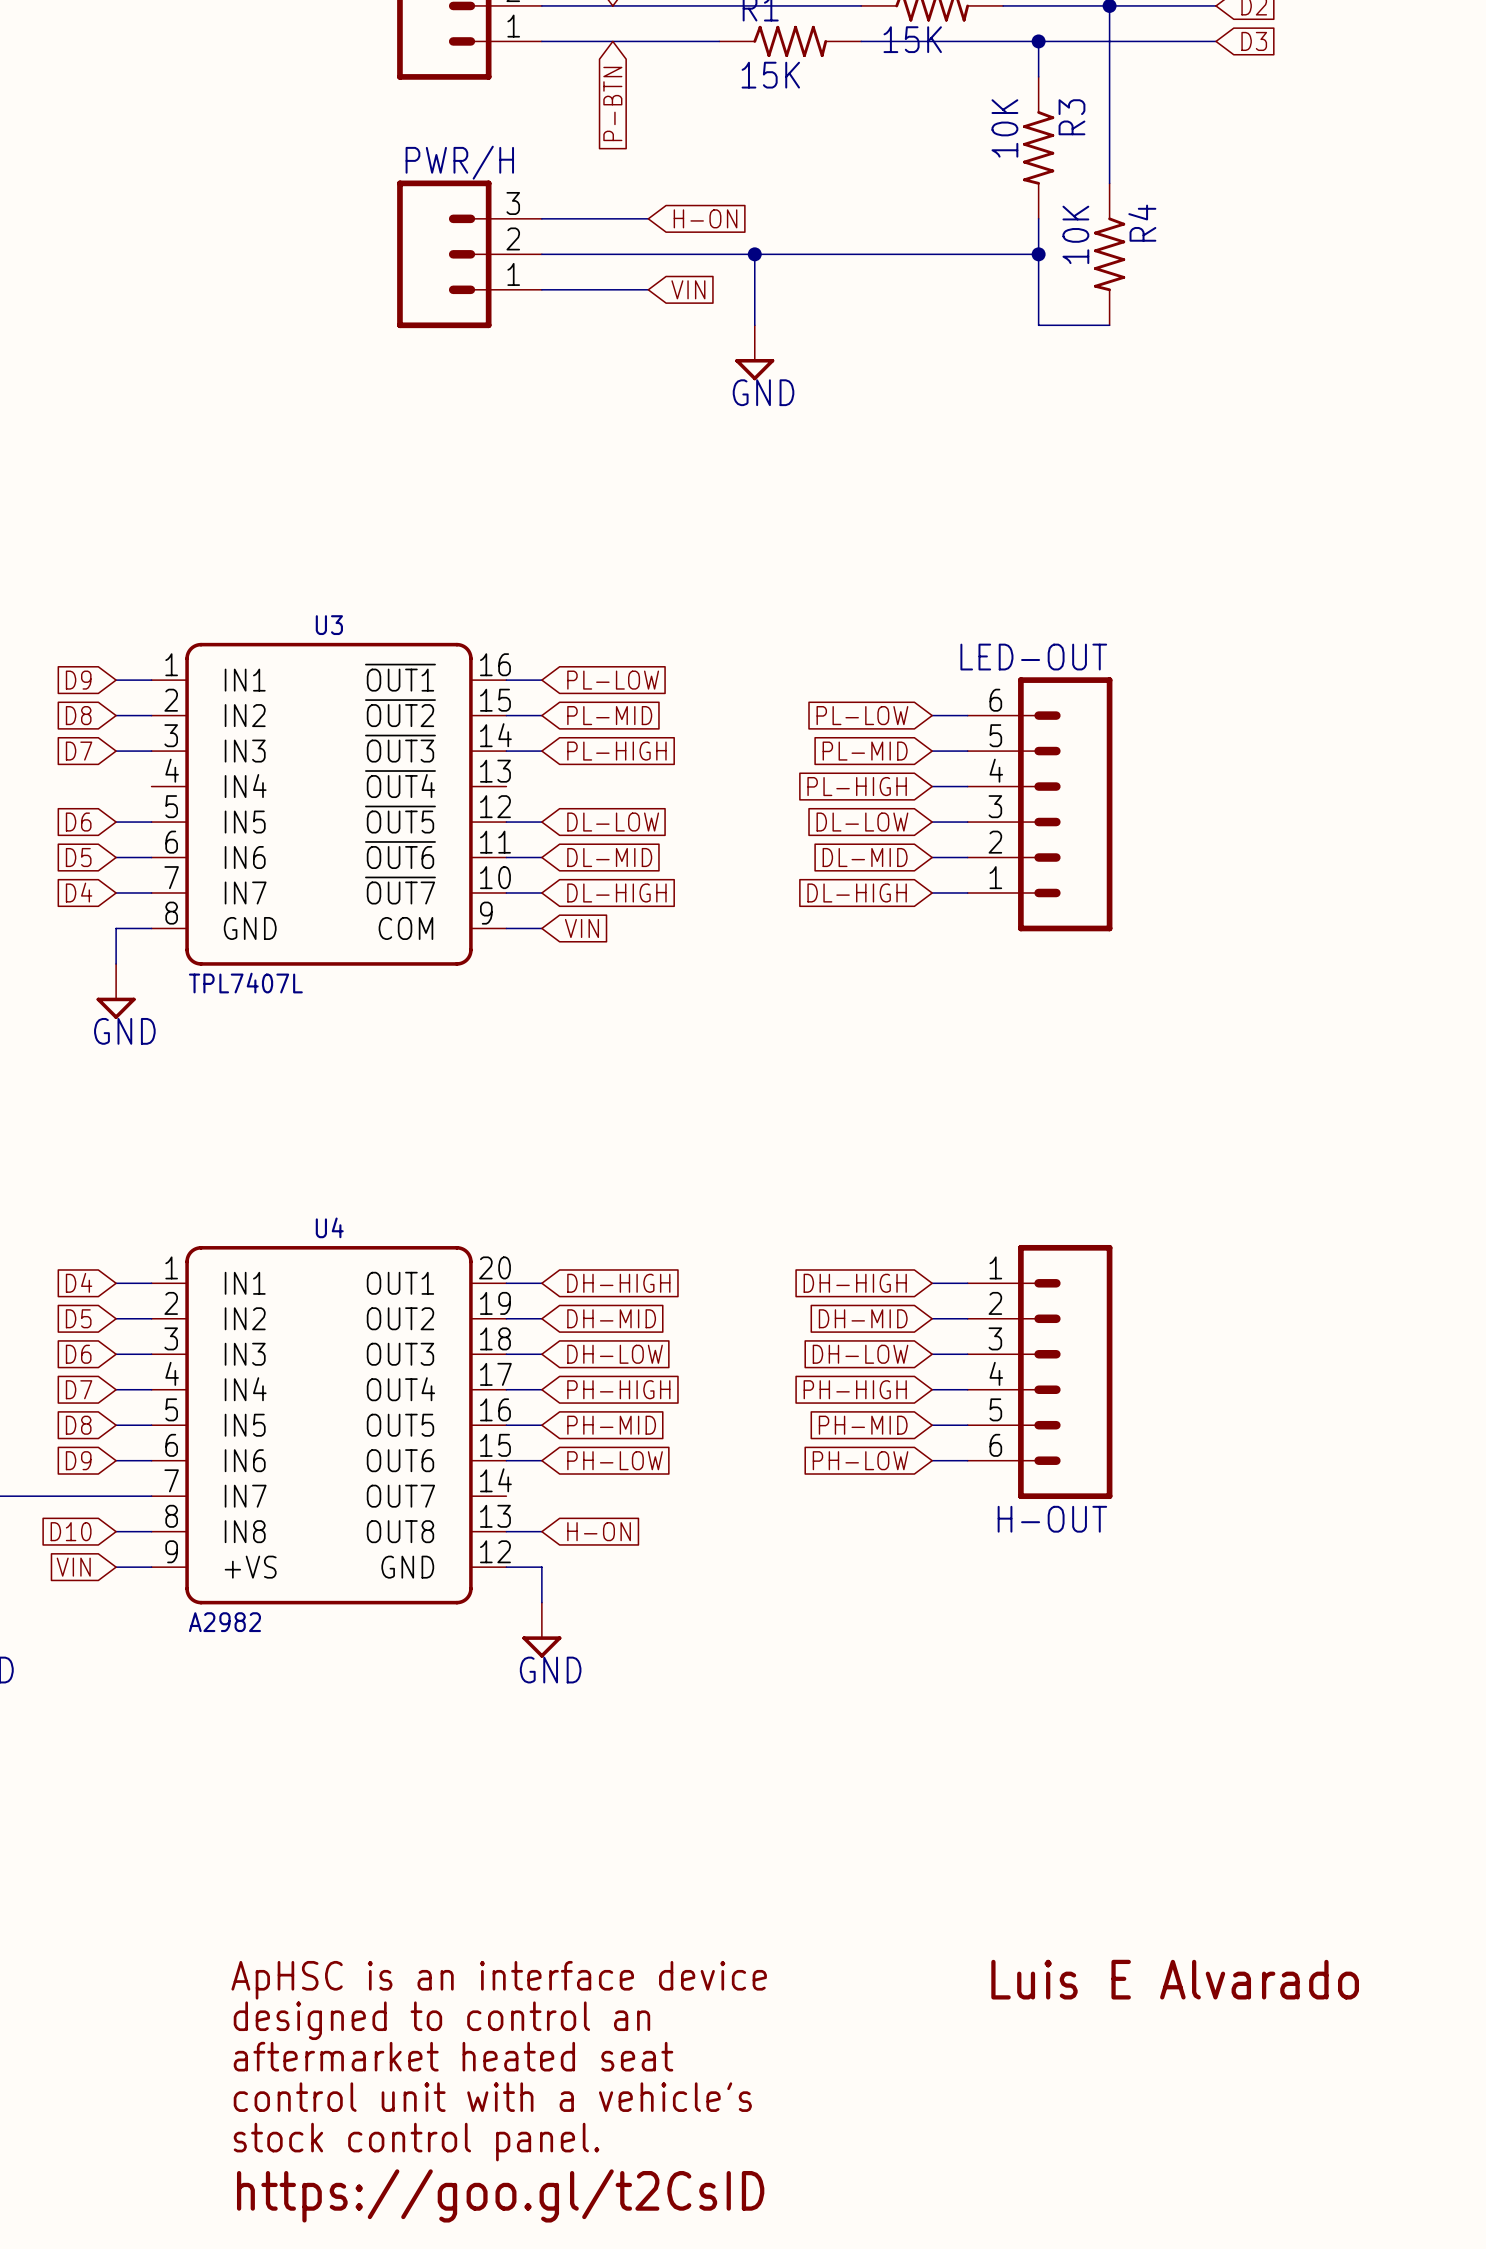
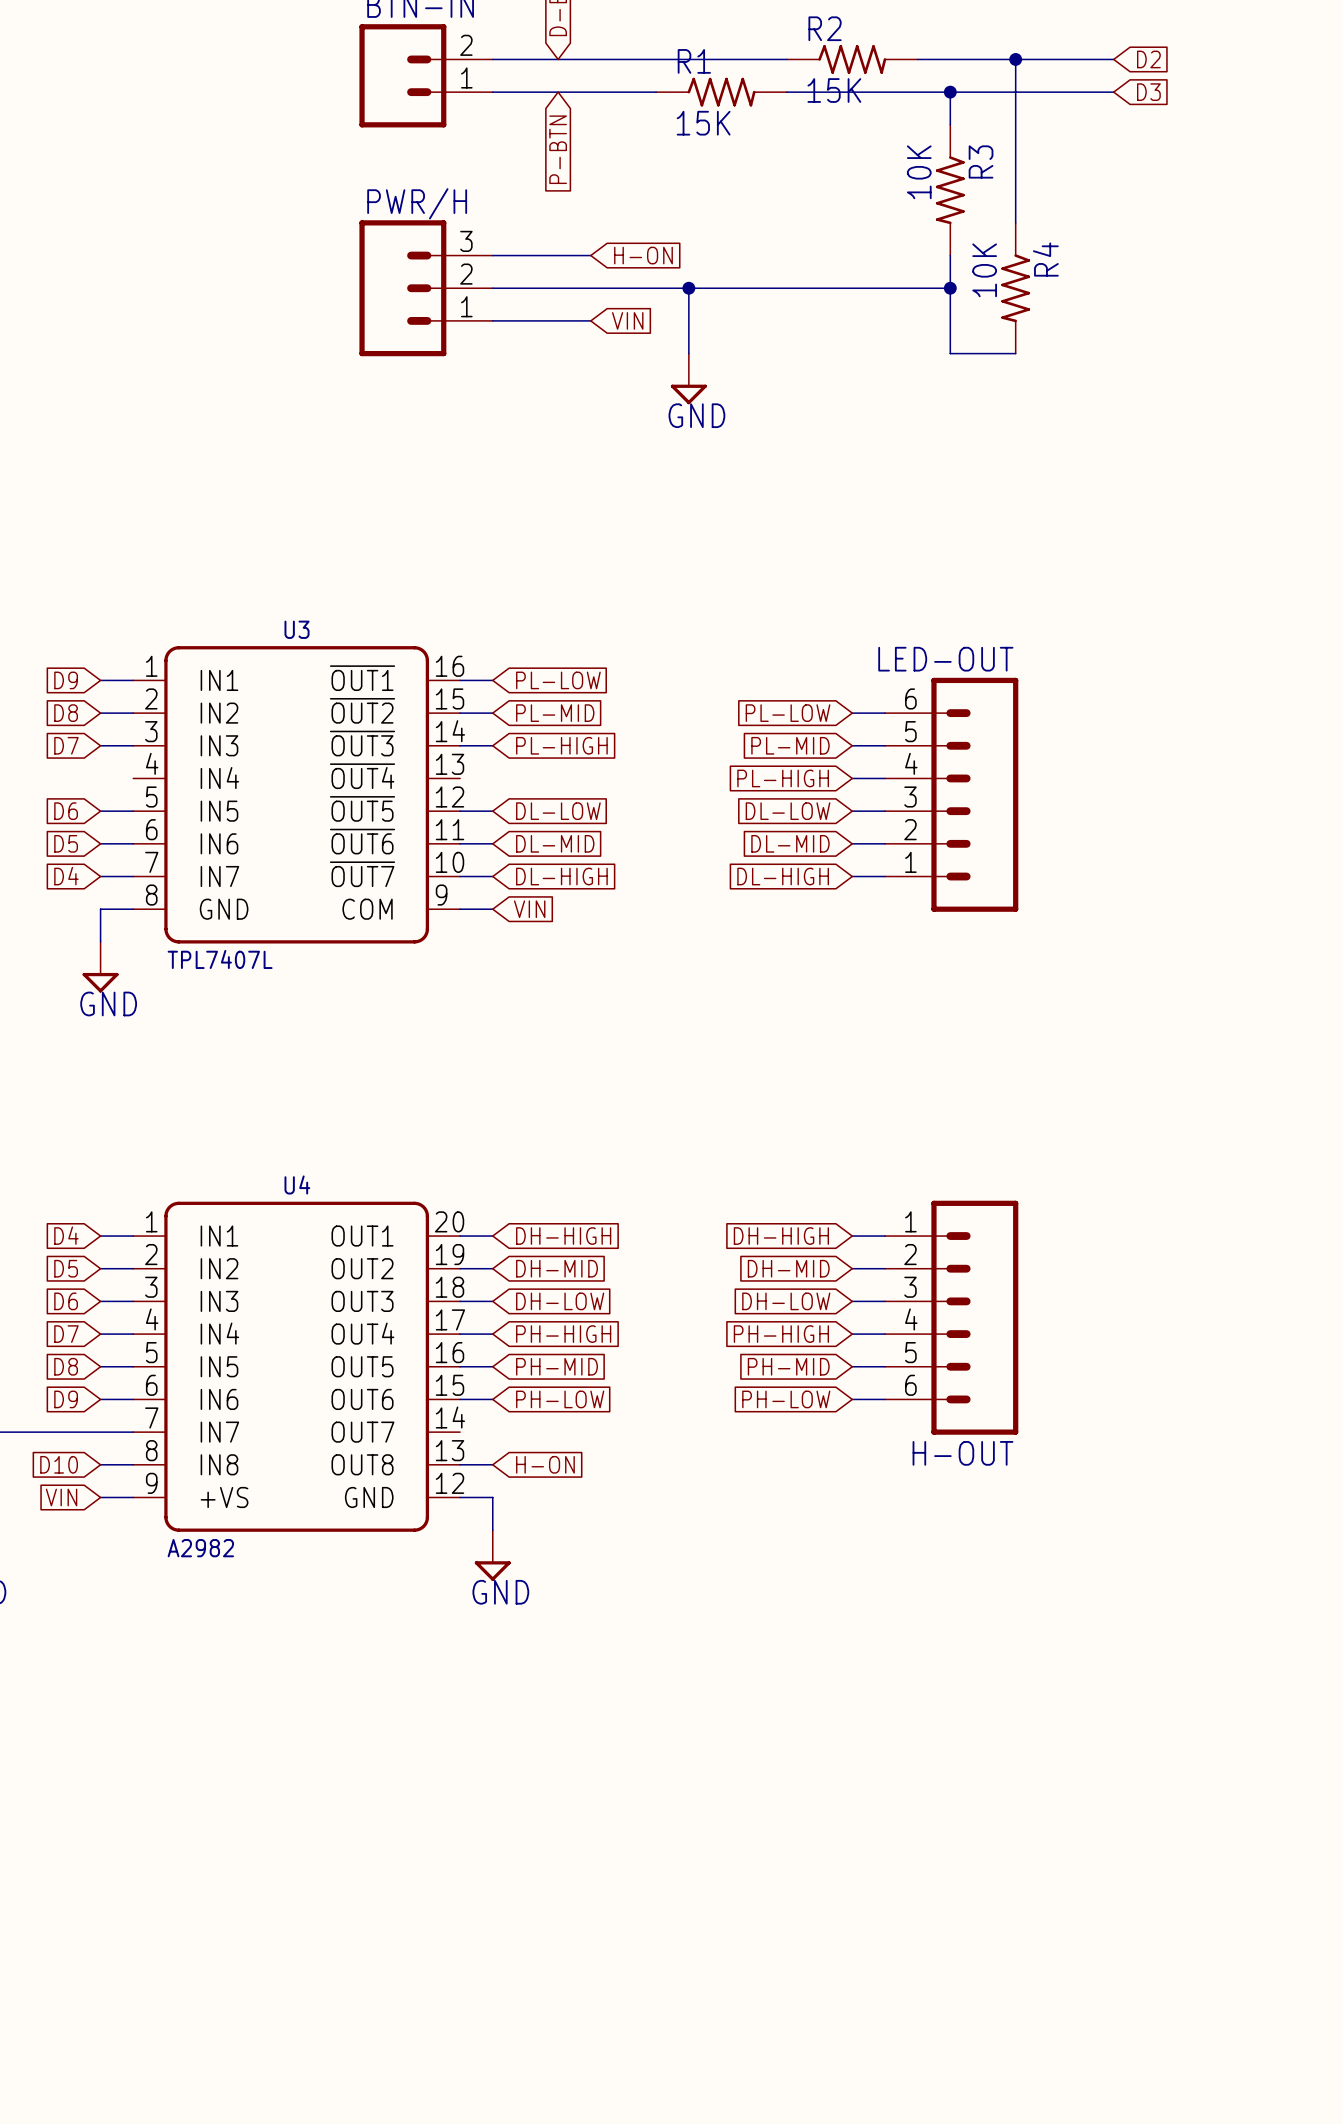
text: Luis E Alvarado (1175, 1979) -> none
text: ApHSC is an interface device (499, 1980) -> none
text: designed to control an (441, 2020) -> none
text: aftermarket heated seat (453, 2056) -> none
text: control unit with a vehicle's (492, 2097) -> none
text: stock control panel. (416, 2142) -> none
text: https://goo.gl/t2CsID (500, 2195) -> none

